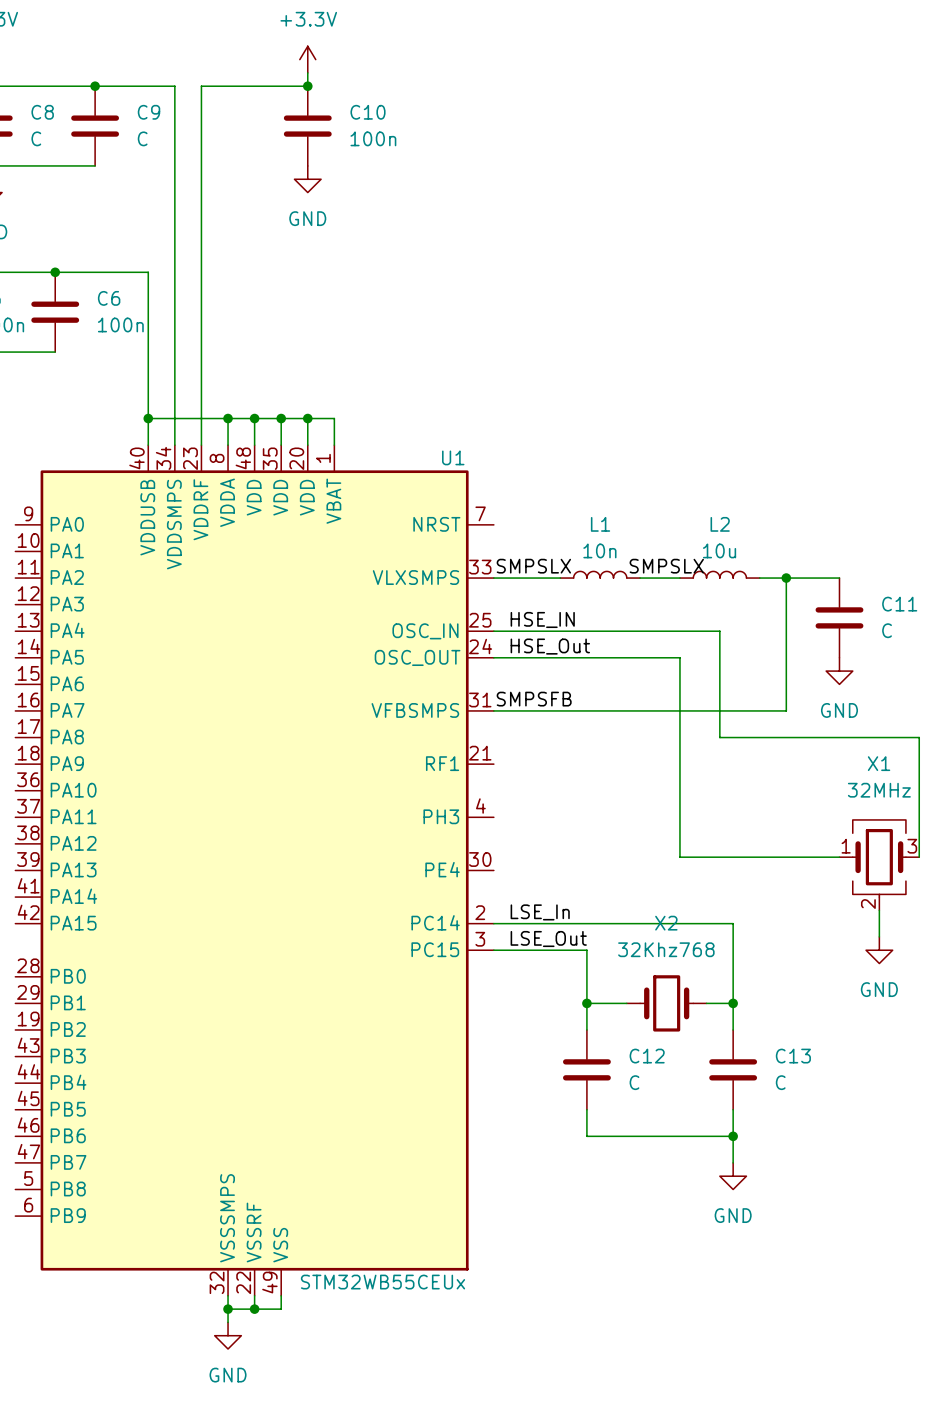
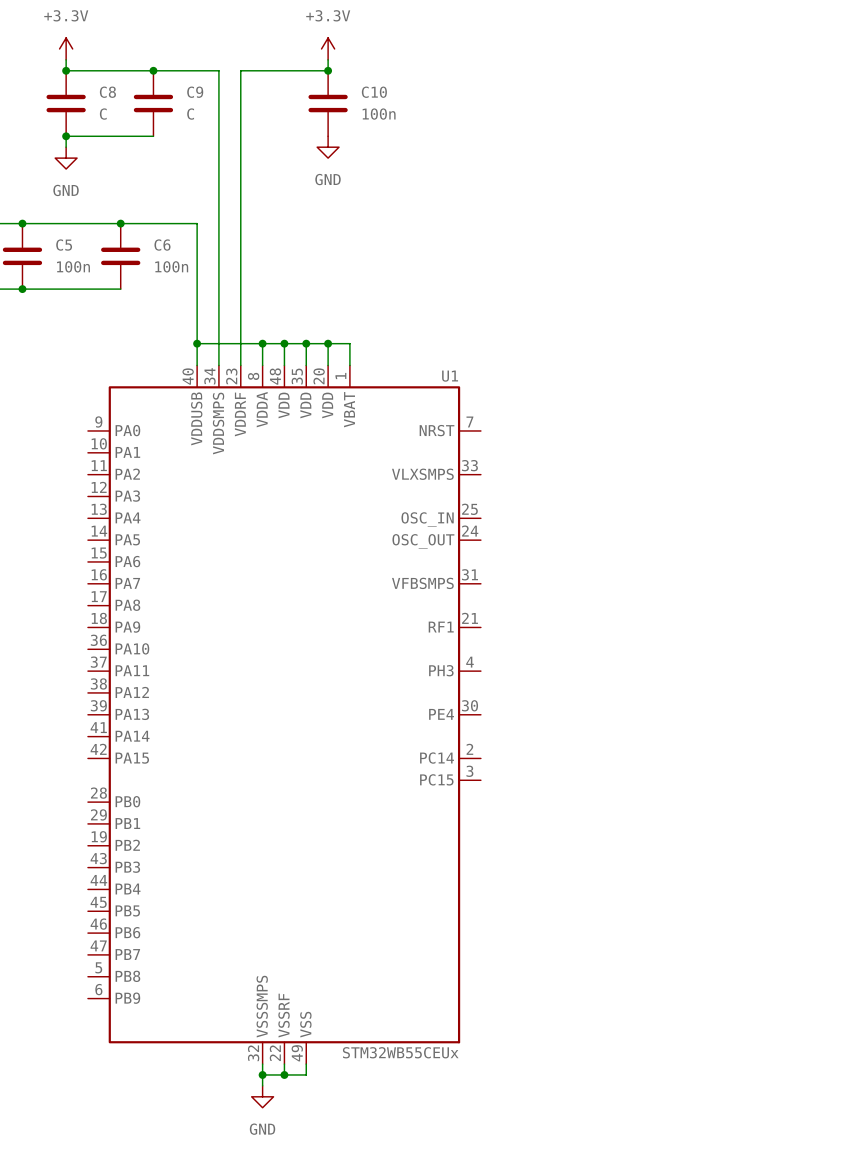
label: SMPSLX (533, 566) -> none
label: SMPSLX (666, 566) -> none
L1: 10n (600, 574) -> none
L2: 10u (719, 574) -> none
wire: (493, 578) (560, 578) -> none
wire: (640, 578) (679, 578) -> none
wire: (759, 578) (839, 578) -> none
wire: (786, 578) (786, 710) (493, 710) -> none
junction: (786, 578) -> none
C11: C (839, 617) -> none
label: HSE_IN (542, 619) -> none
wire: (493, 631) (719, 631) (719, 737) (919, 737) (919, 857) -> none
label: HSE_Out (550, 646) -> none
wire: (493, 657) (679, 657) (679, 857) (839, 857) -> none
power symbol: GND (839, 671) -> none
label: SMPSFB (534, 699) -> none
X1: 32MHz (879, 865) -> none
wire: (879, 910) (879, 936) -> none
label: LSE_In (540, 912) -> none
wire: (493, 923) (733, 923) (733, 1029) -> none
label: LSE_Out (548, 939) -> none
wire: (493, 950) (586, 950) (586, 1029) -> none
power symbol: GND (879, 950) -> none
wire: (586, 1003) (626, 1003) -> none
junction: (586, 1003) -> none
X2: 32Khz768 (666, 1003) -> none
wire: (706, 1003) (733, 1003) -> none
junction: (733, 1003) -> none
C12: C (586, 1069) -> none
C13: C (733, 1069) -> none
wire: (586, 1109) (586, 1136) (733, 1136) -> none
wire: (733, 1109) (733, 1162) -> none
junction: (733, 1136) -> none
power symbol: GND (733, 1176) -> none

